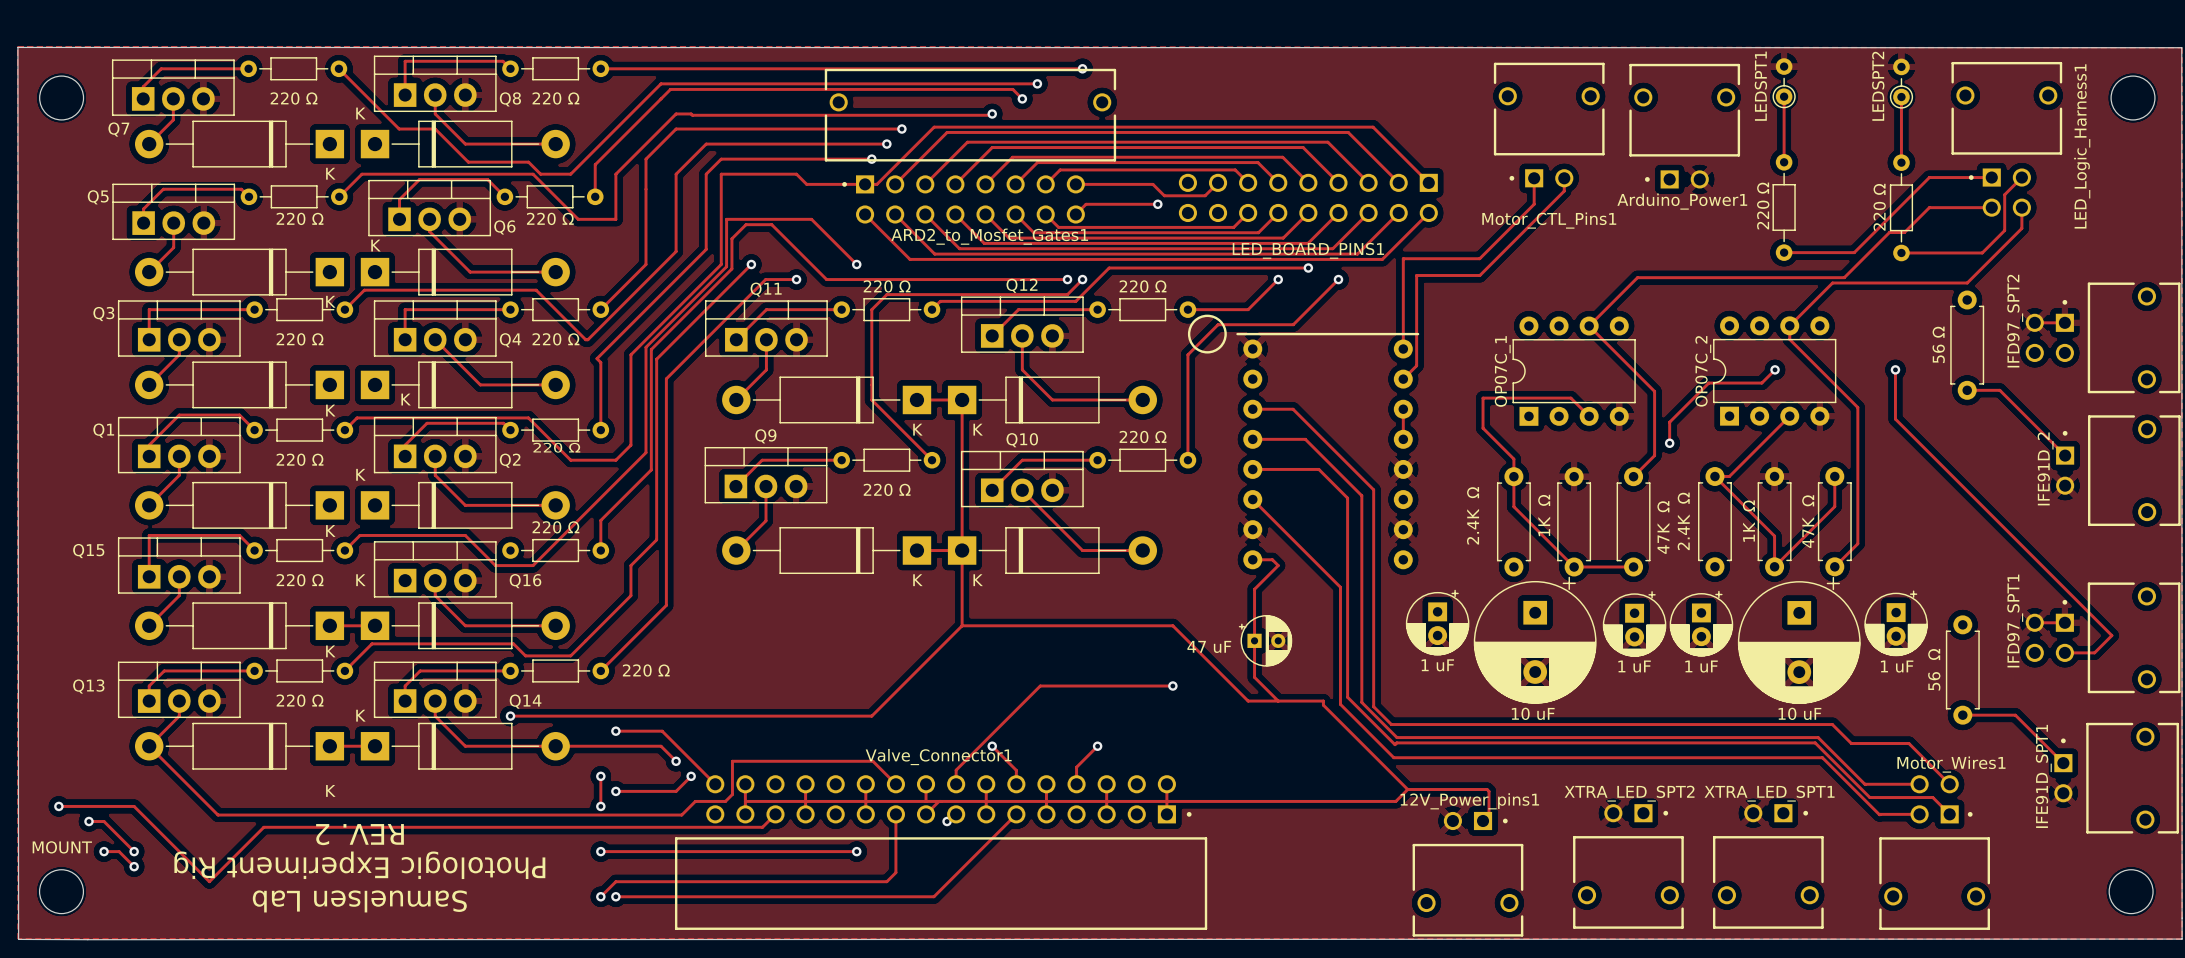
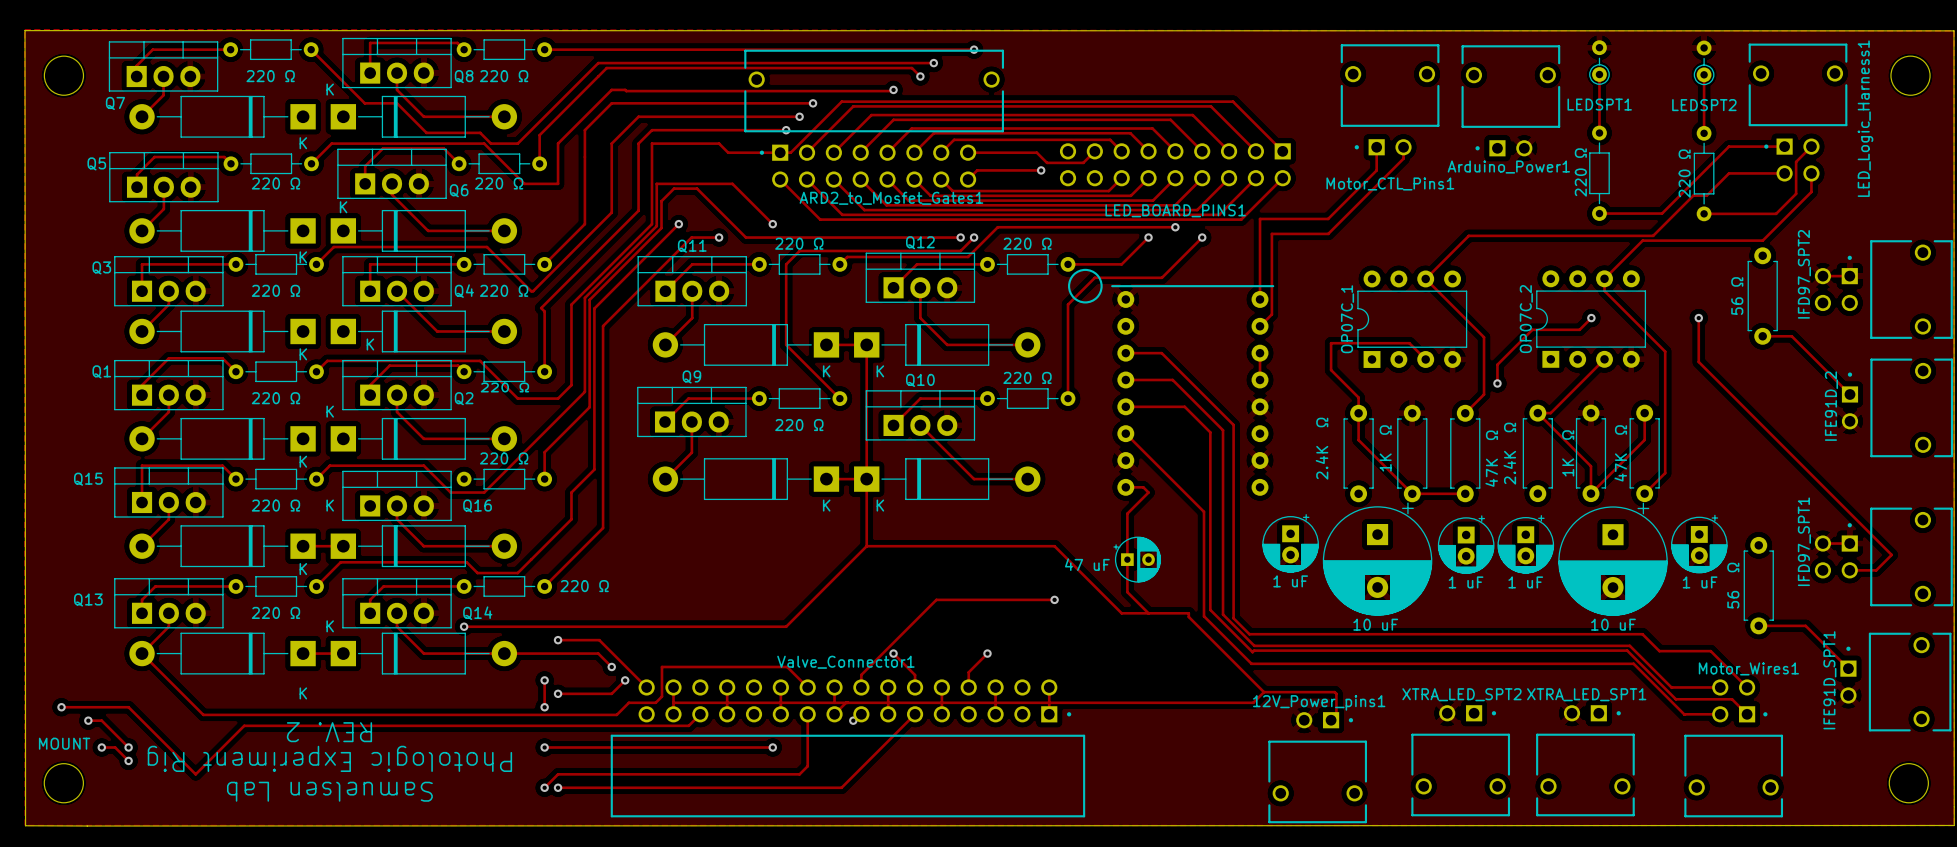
LEDSPT1 name rotation: 0° (1760, 86) -> 90° clockwise (1599, 104)
LEDSPT2 name rotation: 0° (1878, 86) -> 90° clockwise (1704, 105)

